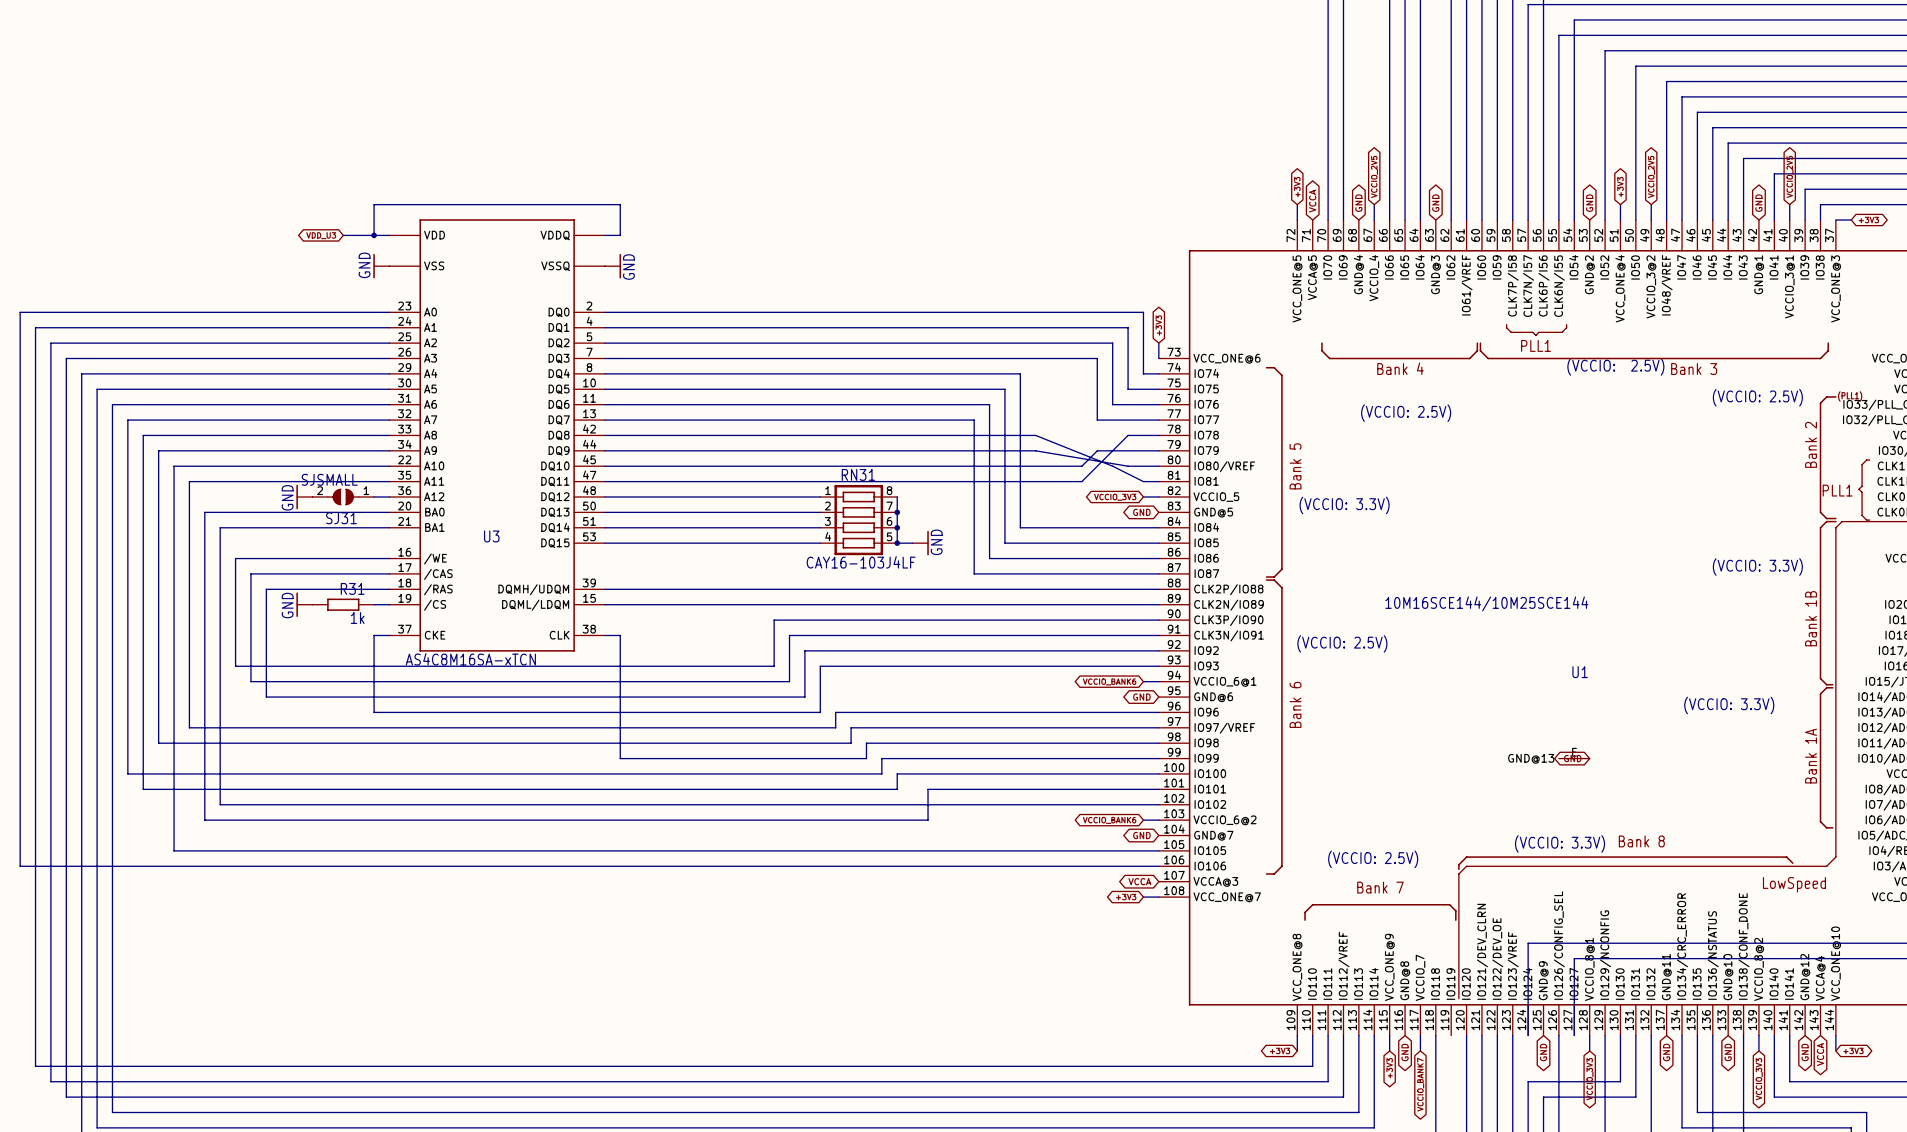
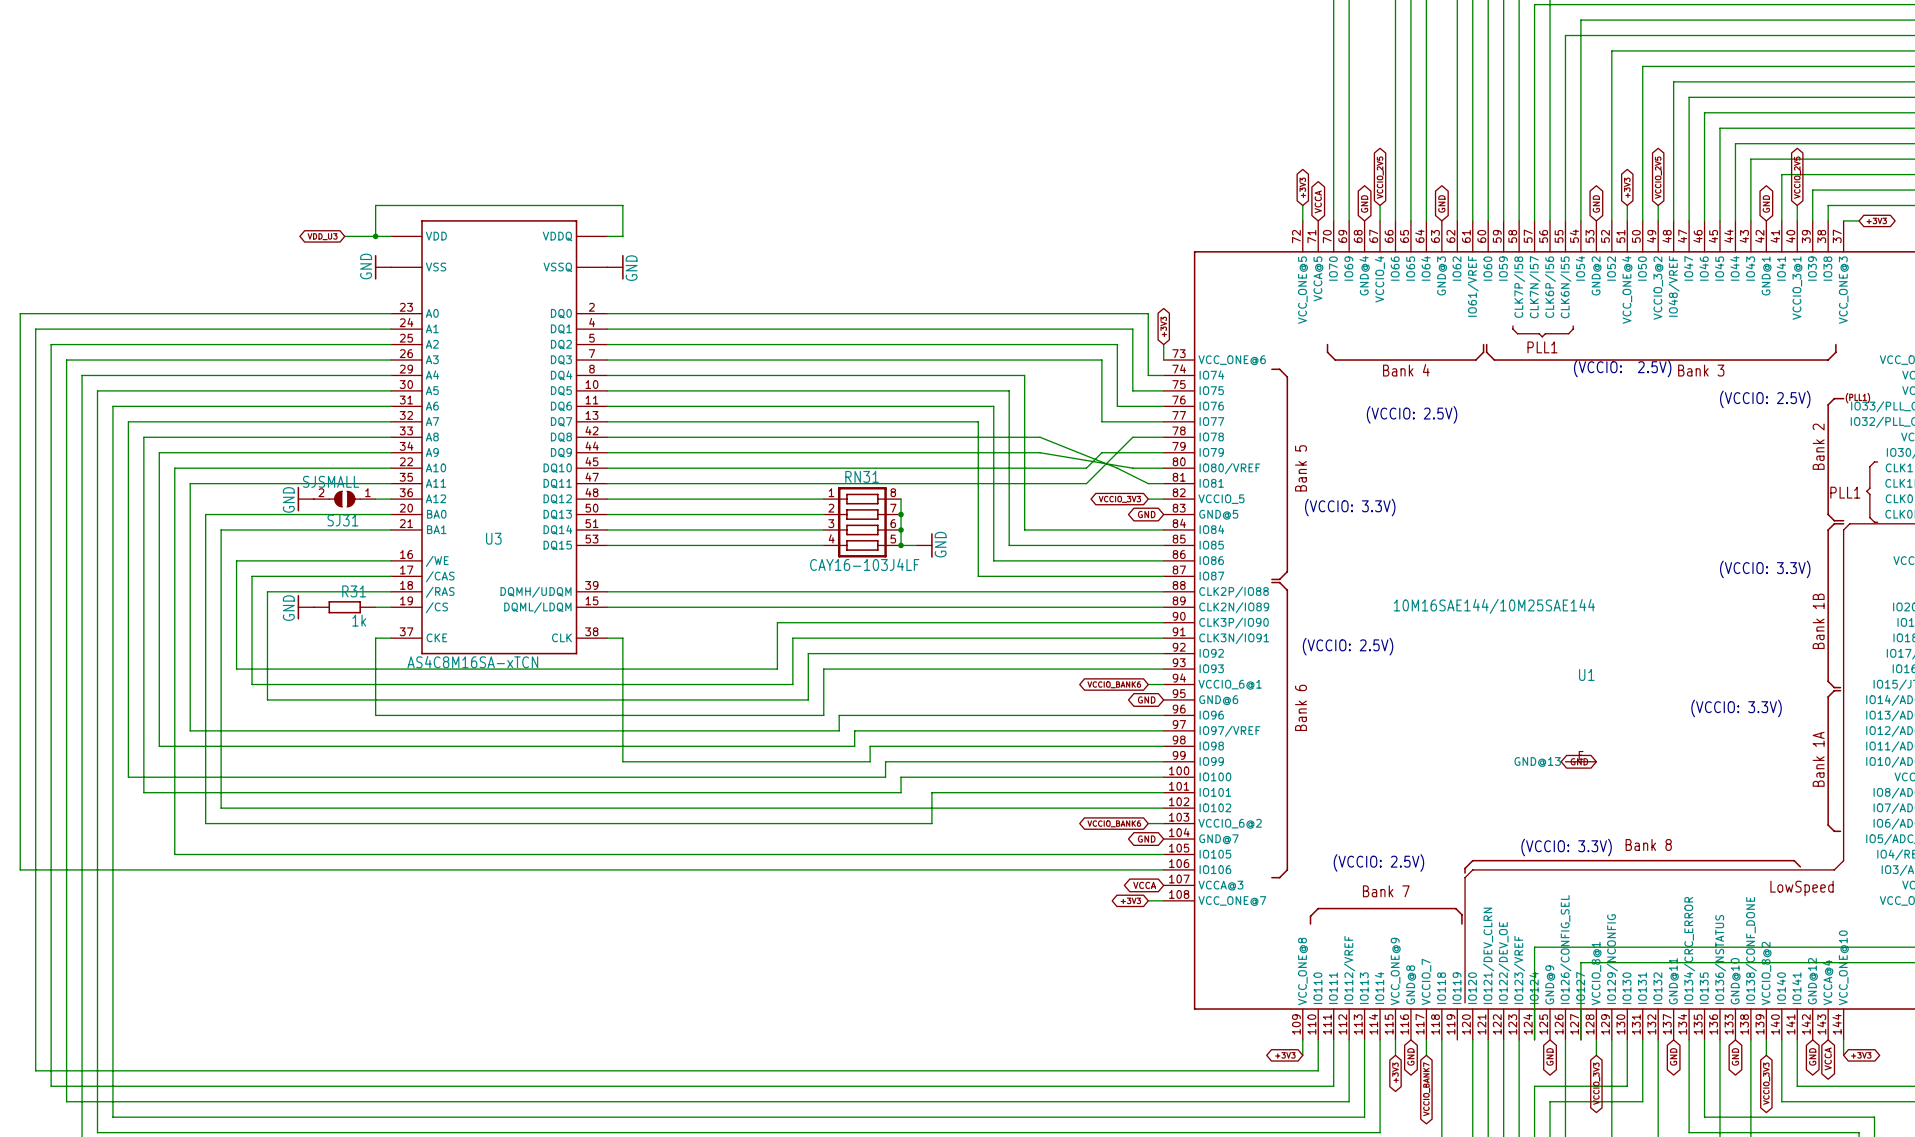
U1 value: 10M16SCE144/10M25SCE144 (1486, 603) -> 10M16SAE144/10M25SAE144 (1494, 606)

